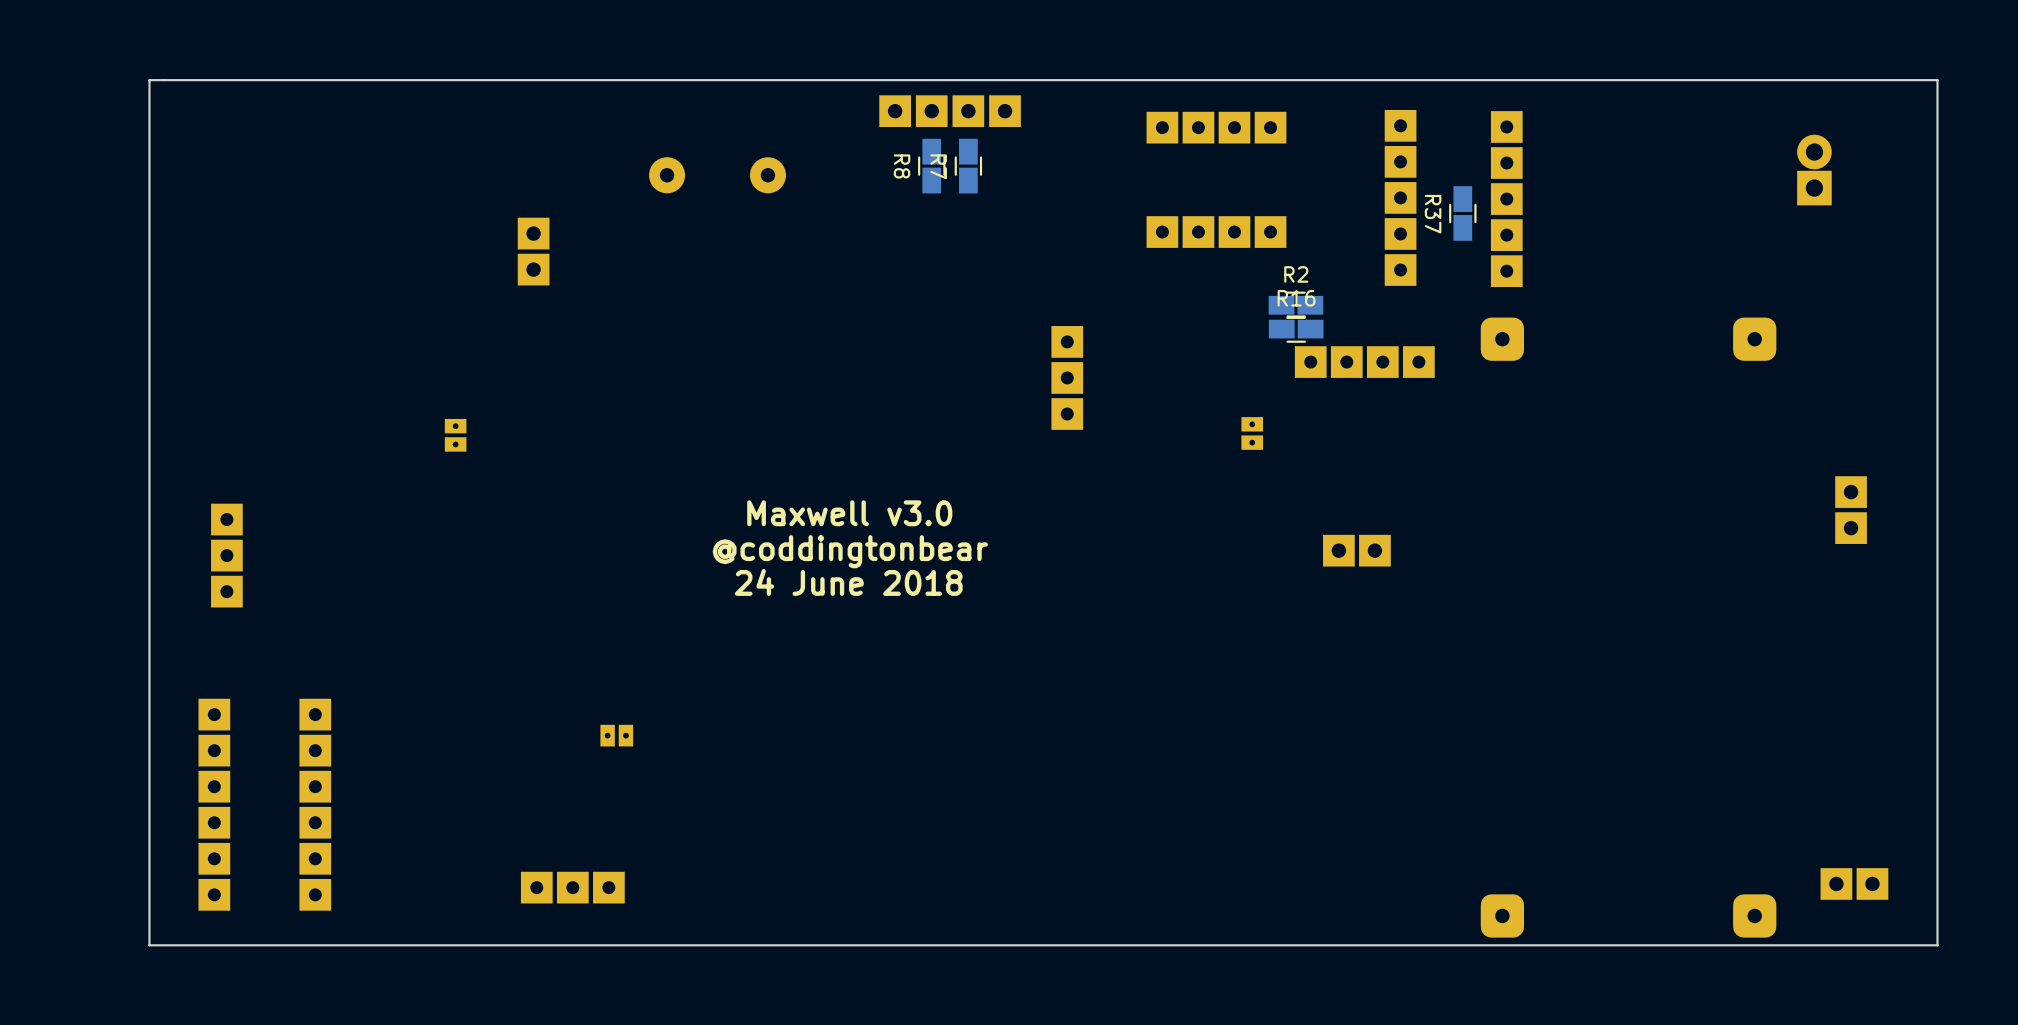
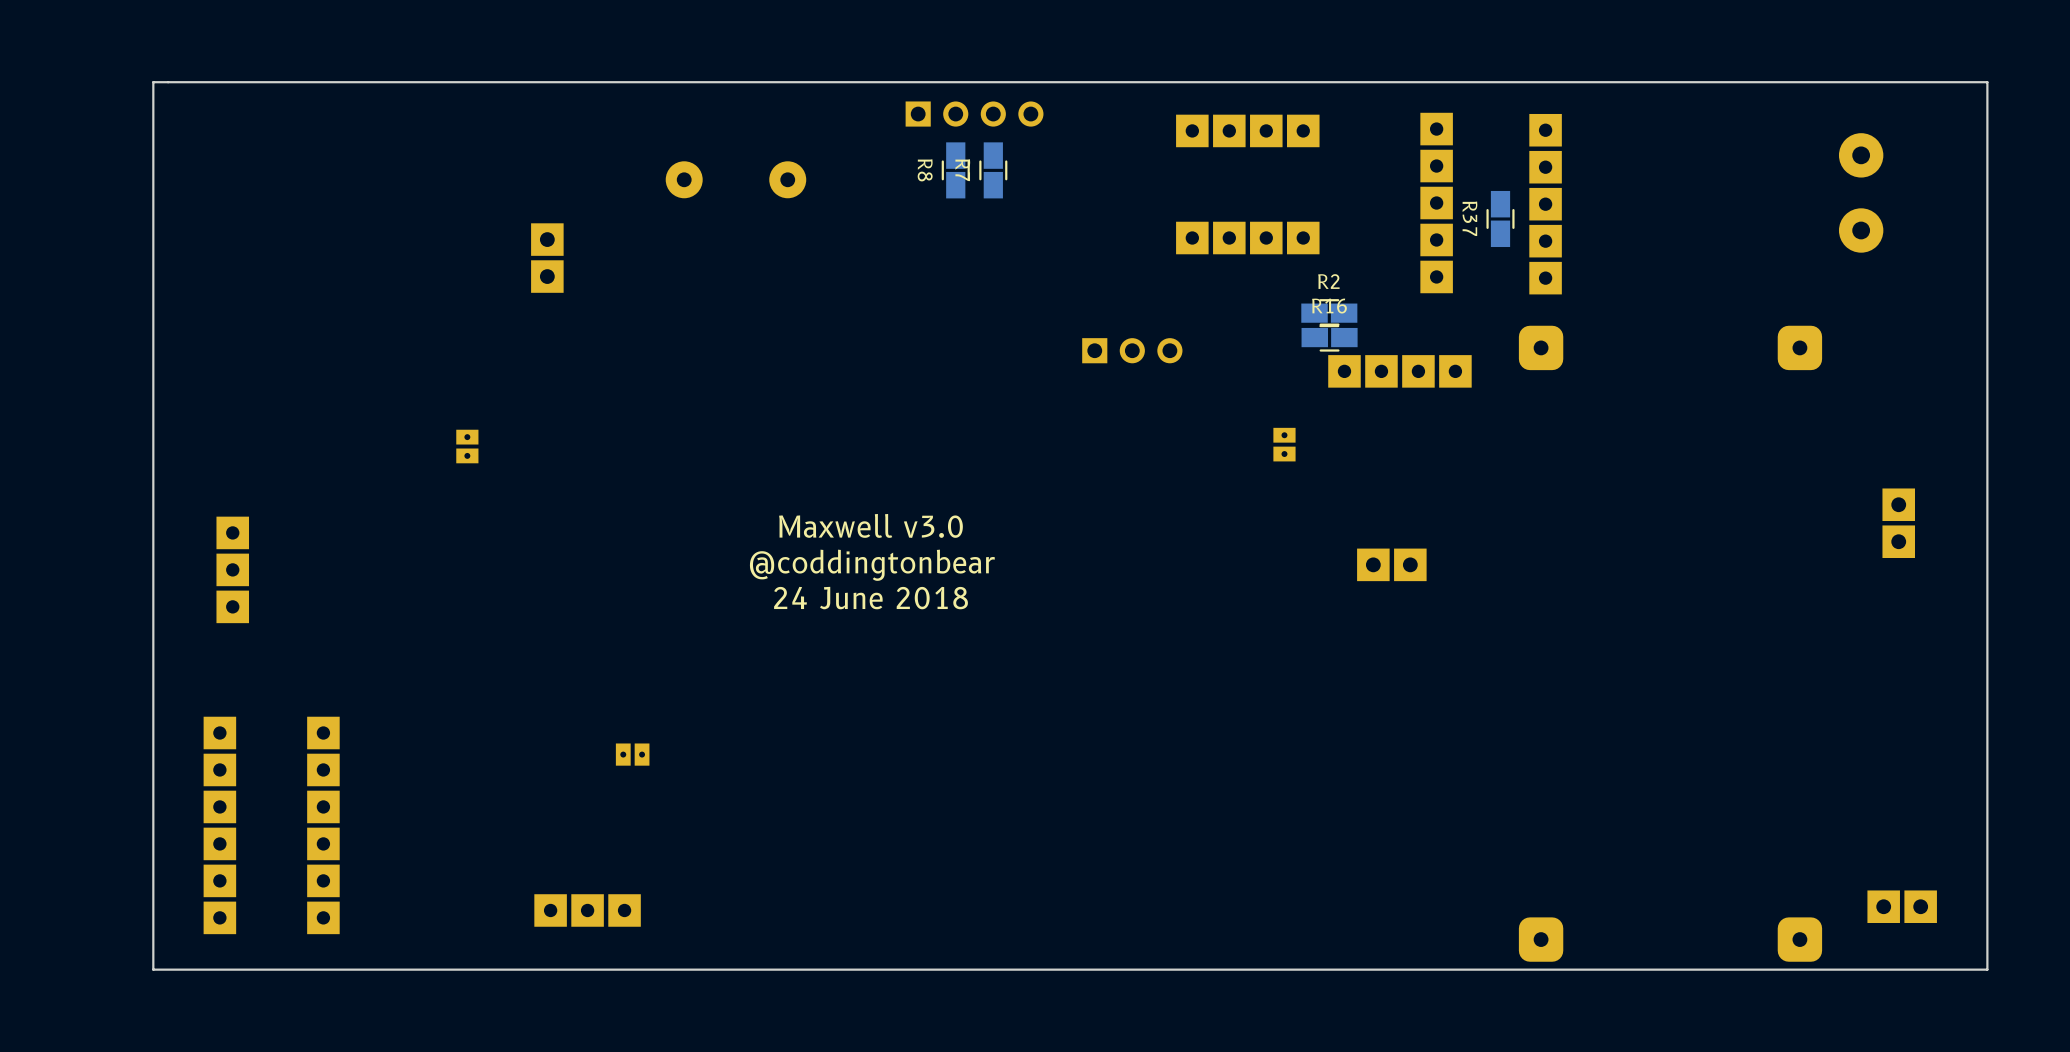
part footprint: [879, 95, 1021, 128] -> [905, 101, 1044, 127]
part: (1814, 170) -> none
part: none -> (1861, 192)
part: none -> (1132, 350)
part: (1067, 377) -> none

